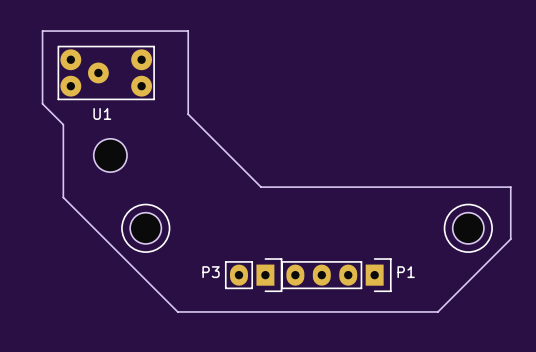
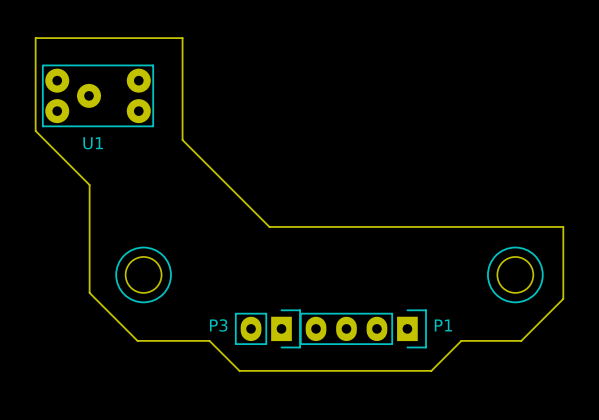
board edge: (42, 31) (42, 103) (63, 124) (63, 197) (177, 311) (437, 311) (510, 239) (510, 187) (261, 187) (188, 114) (188, 31) (42, 31) -> (35, 38) (35, 131) (89, 184) (89, 292) (137, 340) (209, 340) (239, 370) (431, 370) (461, 340) (521, 340) (563, 298) (563, 226) (269, 226) (182, 140) (182, 38) (35, 38)
part: (110, 155) -> none

